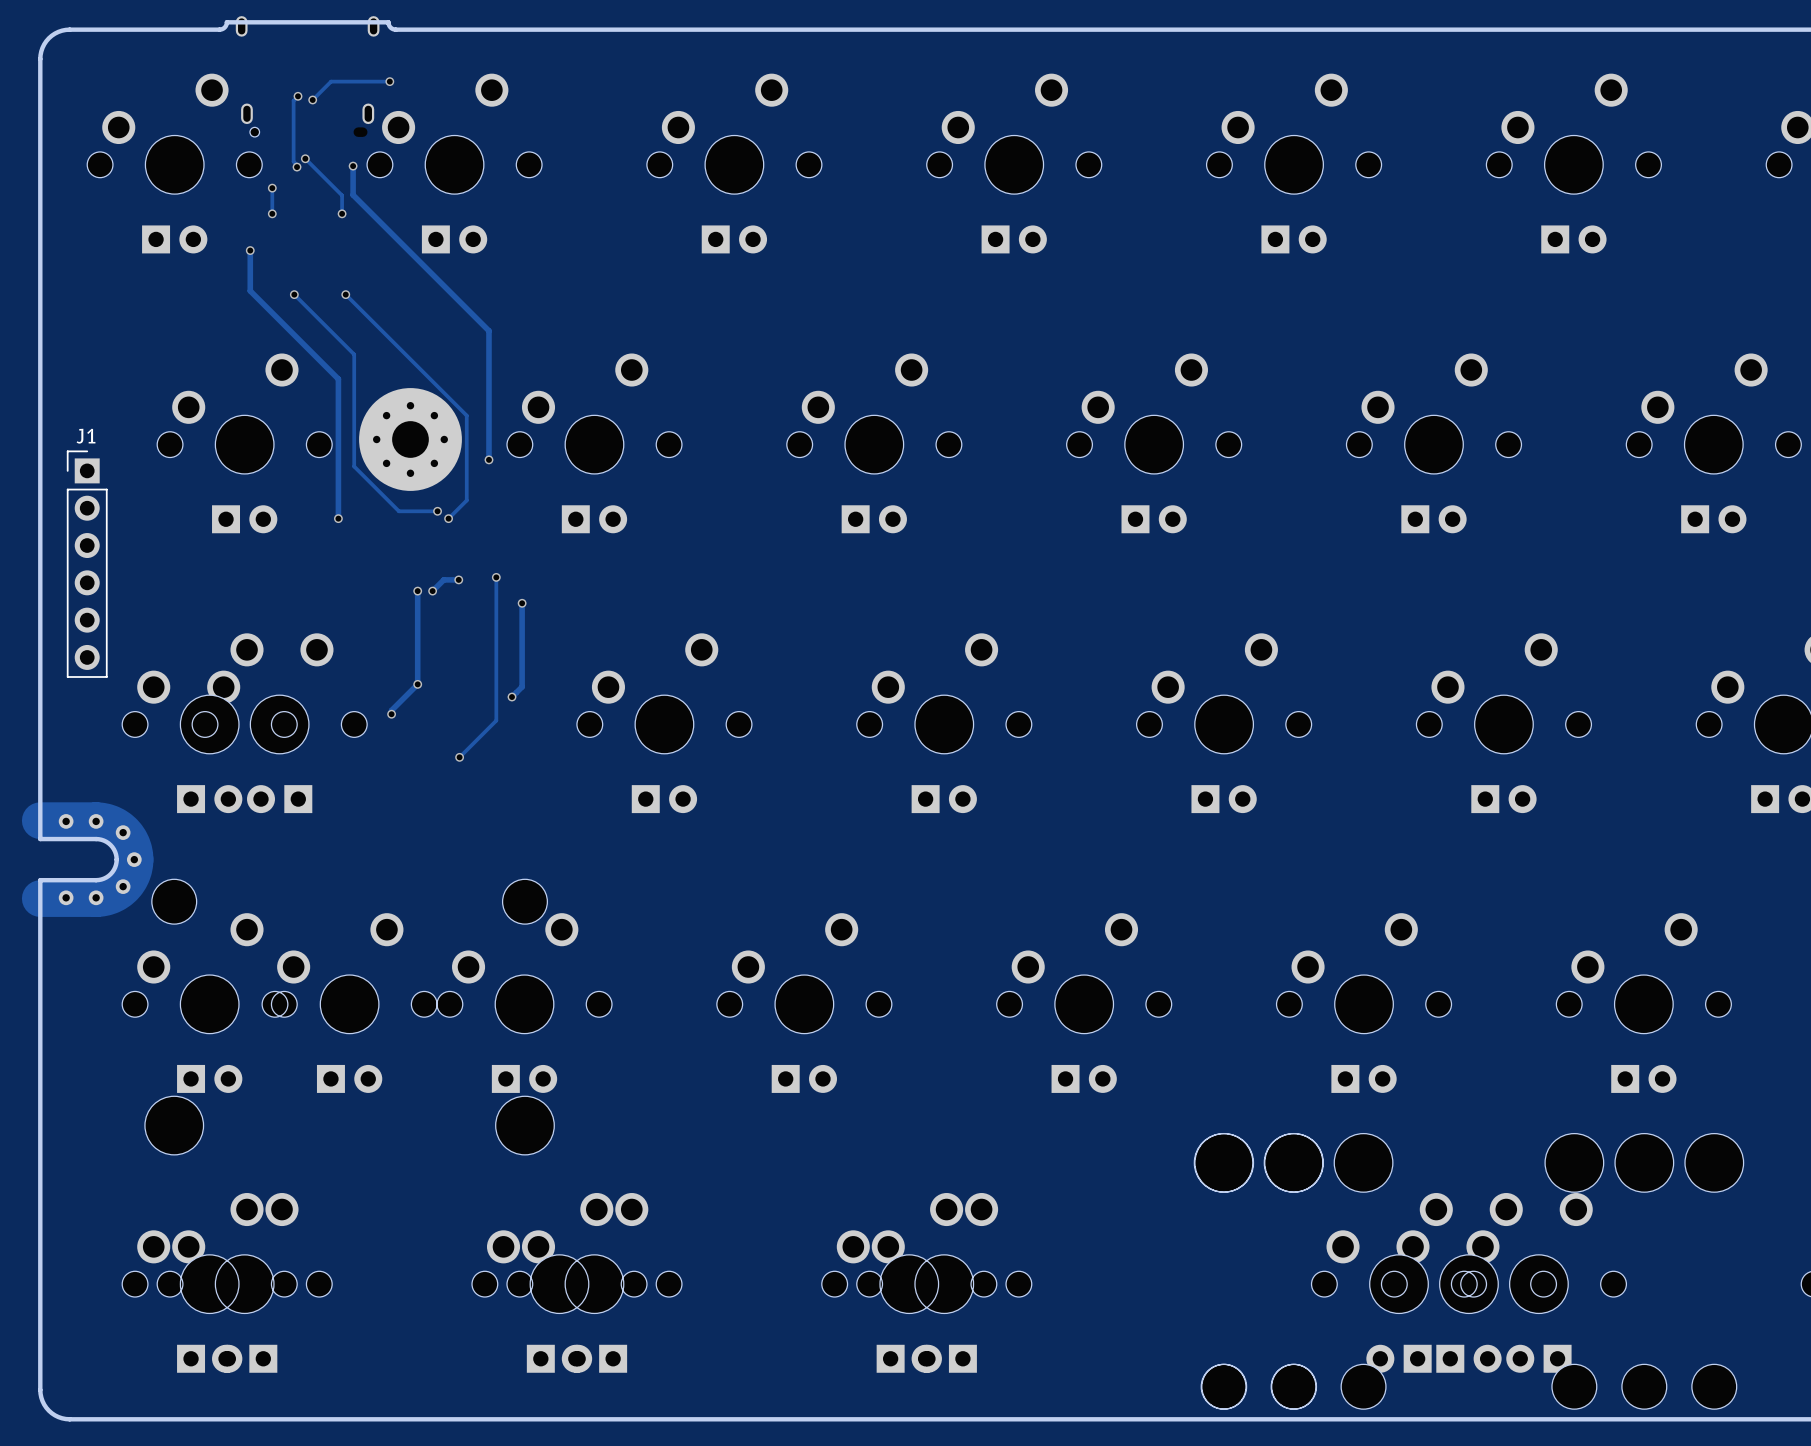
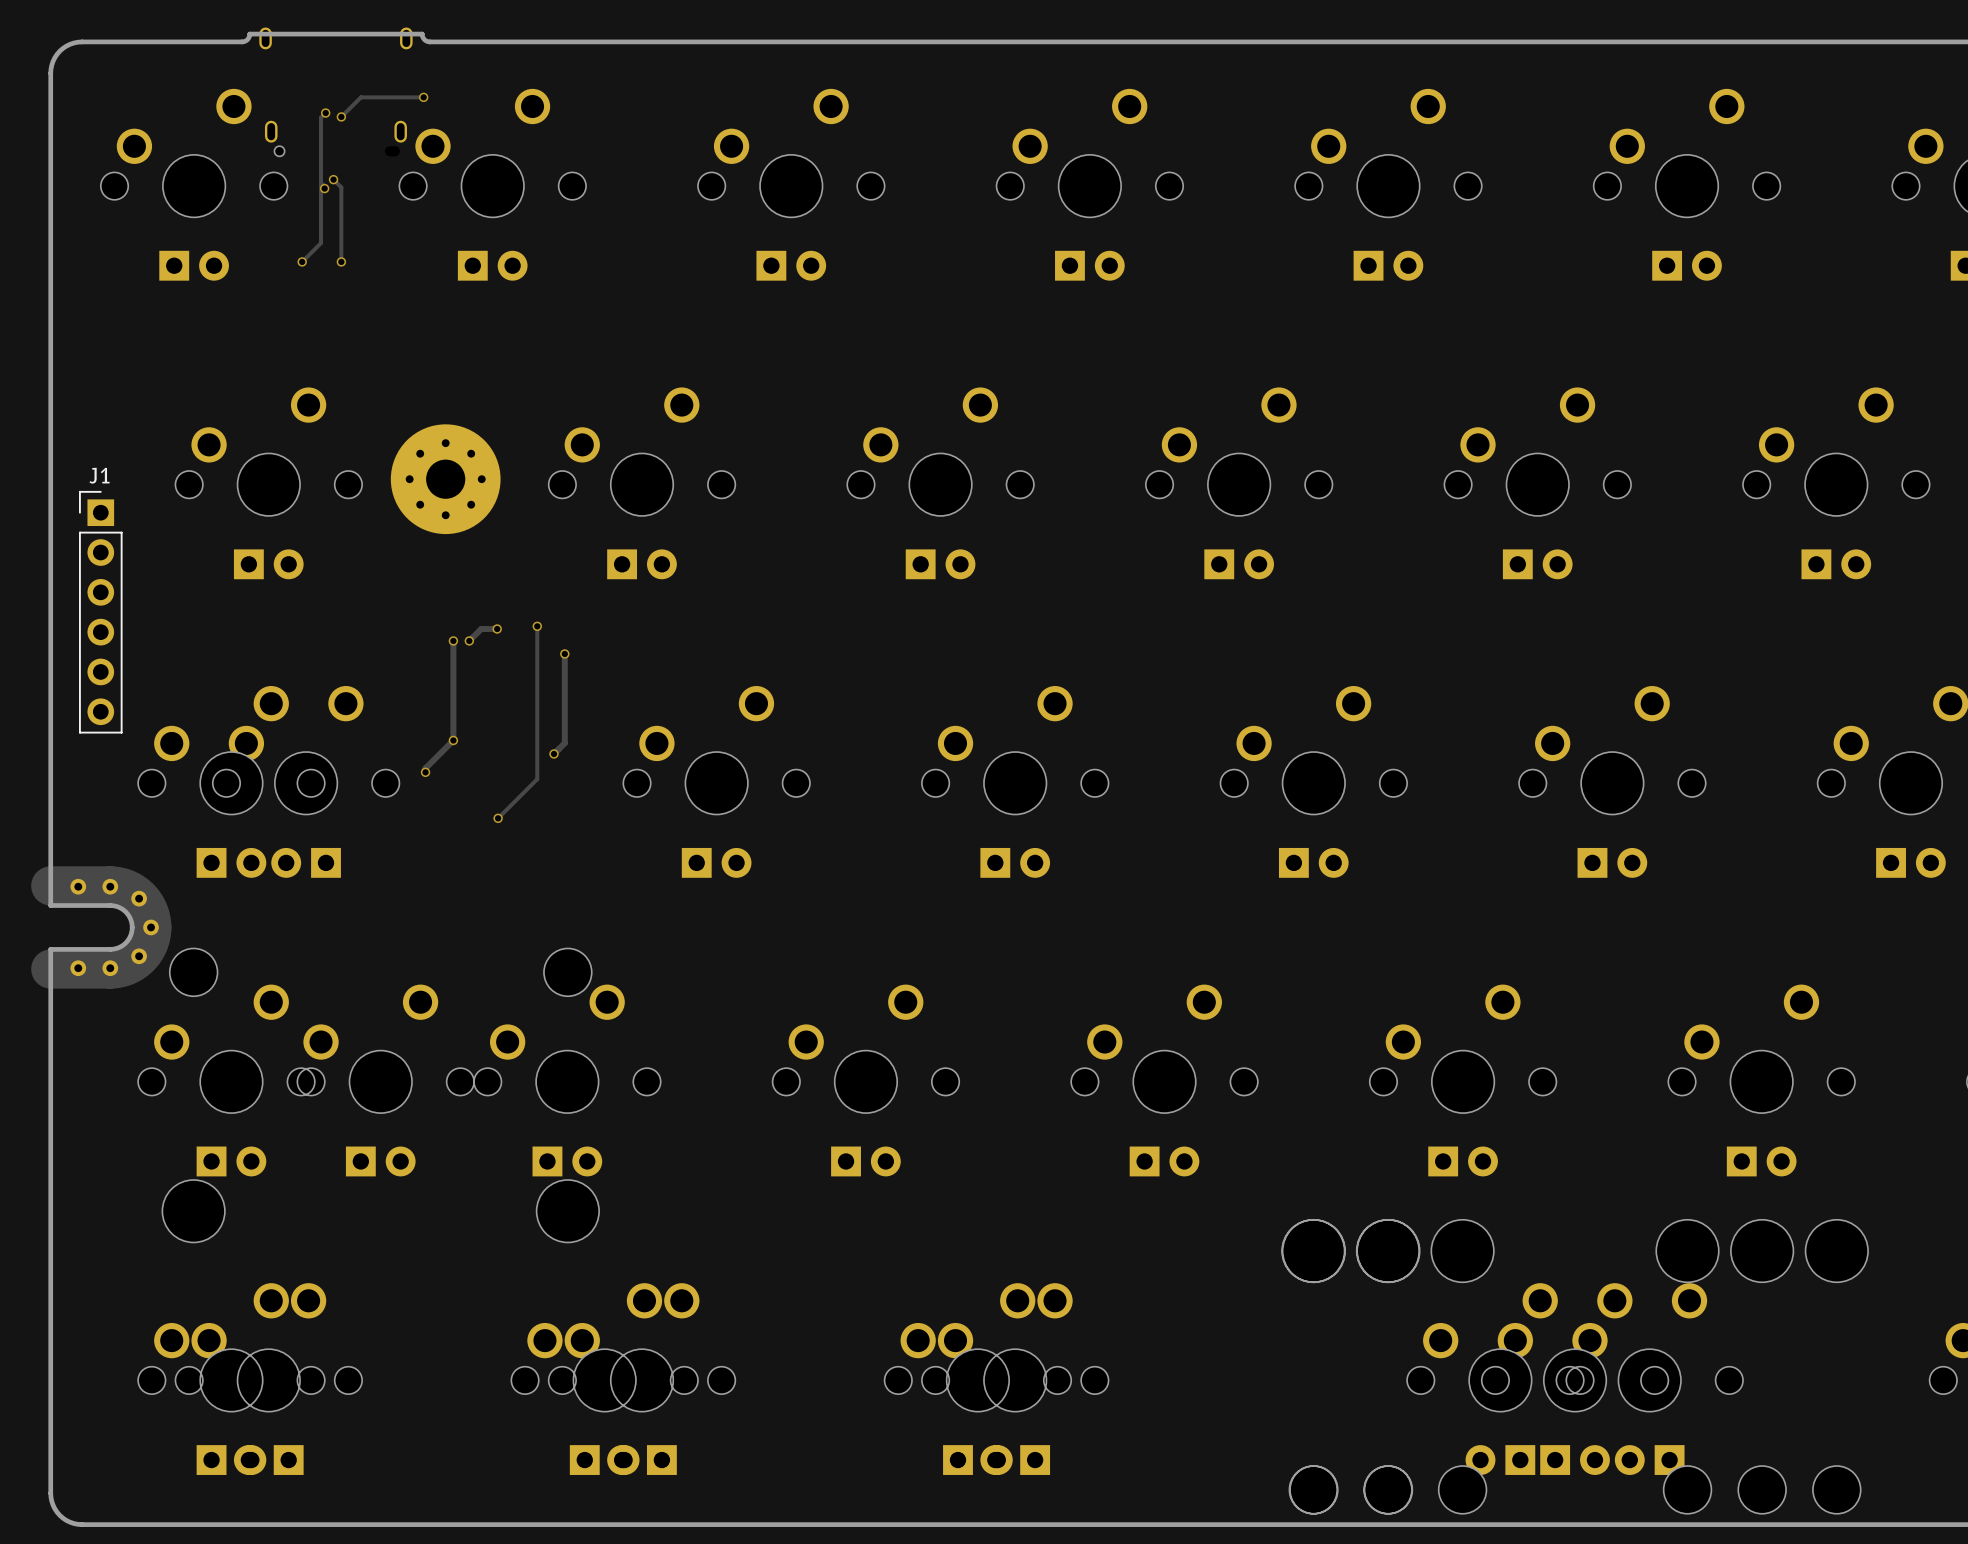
track: none -> (320, 182) (320, 243) (302, 261)
track: (312, 166) (342, 195) (342, 213) -> (341, 187) (341, 261)
track: (353, 166) (353, 195) (488, 330) (488, 459) -> none
via: (353, 166) -> none
track: (272, 188) (272, 213) -> none
via: (272, 188) -> none
via: (272, 213) -> none
via: (342, 213) -> none
via: none -> (302, 261)
via: none -> (341, 261)
track: (250, 250) (250, 290) (338, 379) (338, 518) -> none
via: (250, 250) -> none
track: (294, 294) (354, 354) (354, 466) (398, 511) (437, 511) -> none
via: (294, 294) -> none
track: (345, 294) (466, 415) (466, 500) (448, 518) -> none
via: (345, 294) -> none
via: (488, 459) -> none
via: (437, 511) -> none
via: (338, 518) -> none
via: (448, 518) -> none

